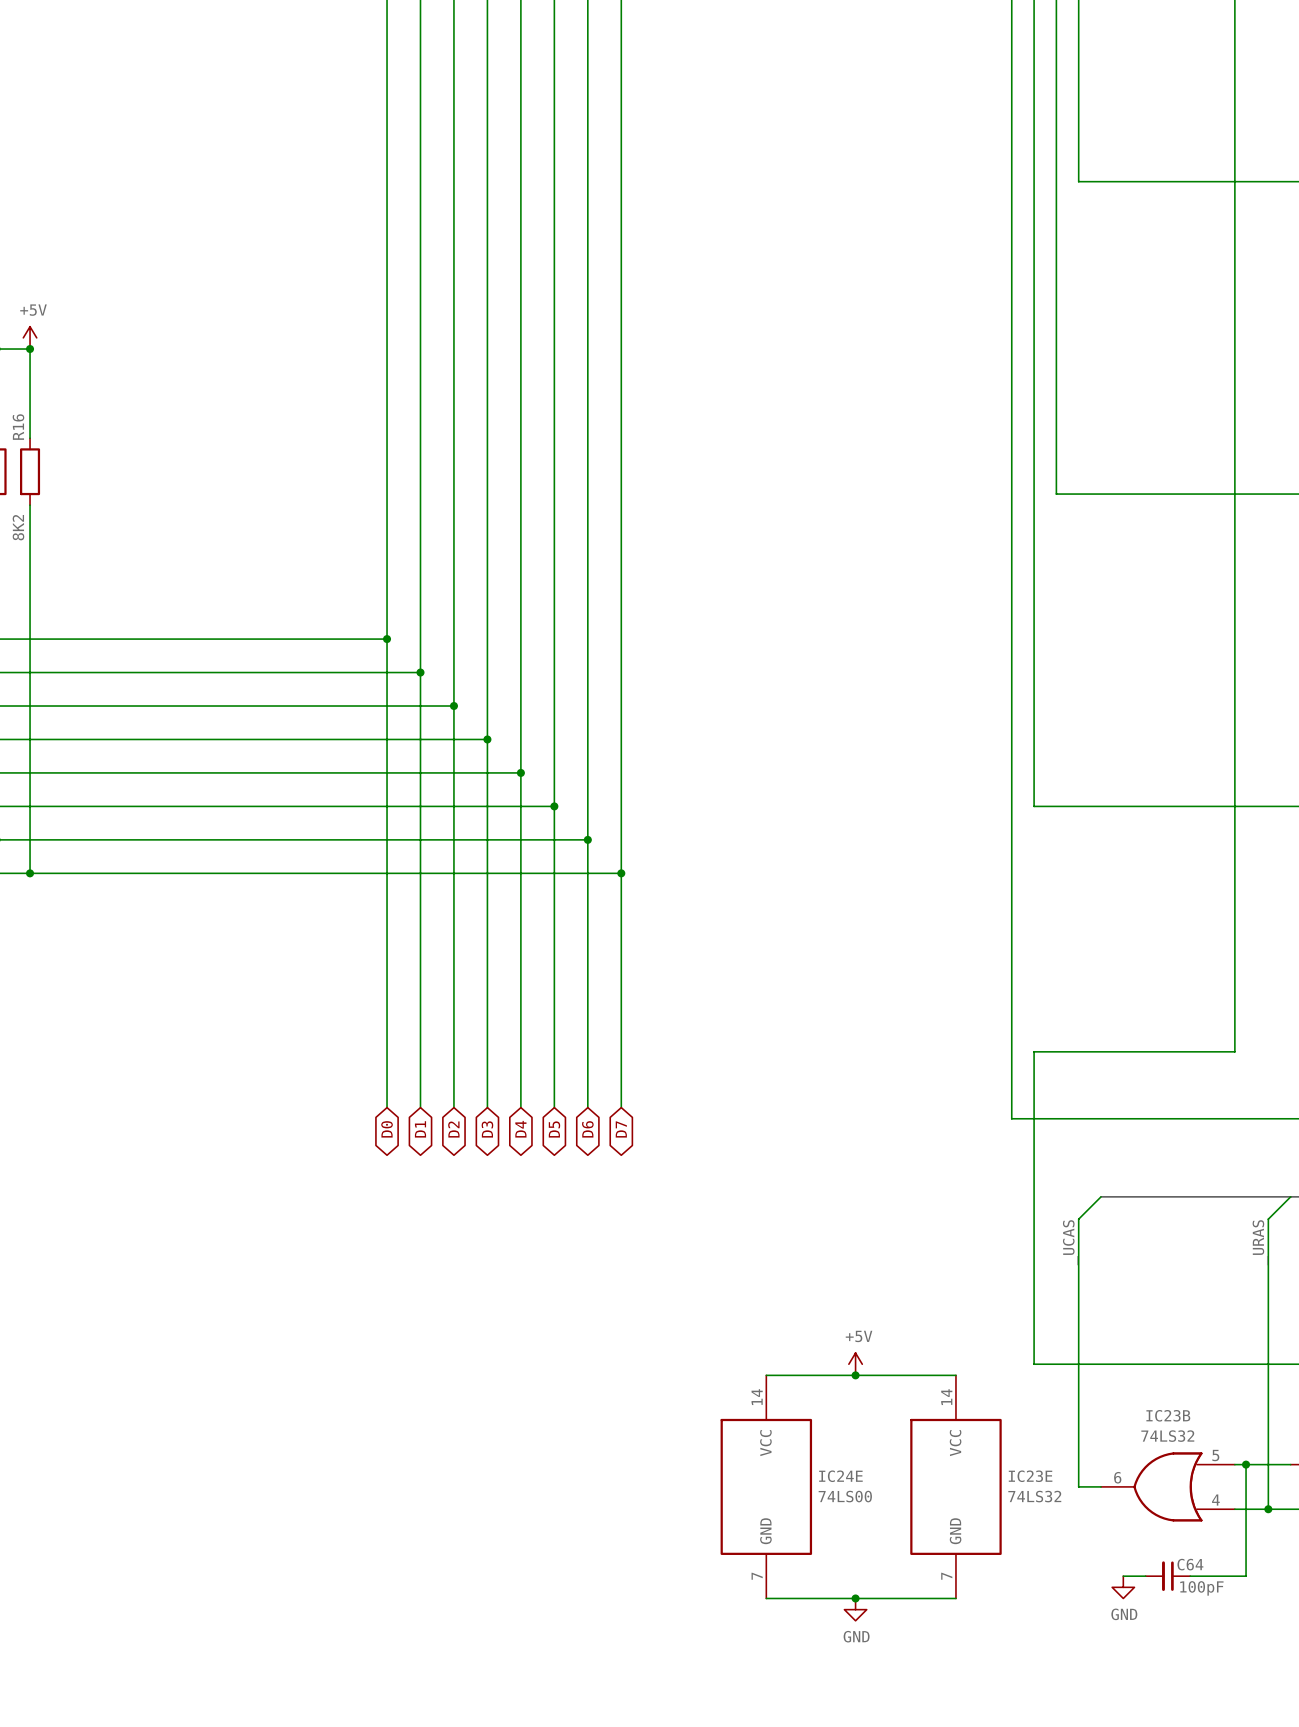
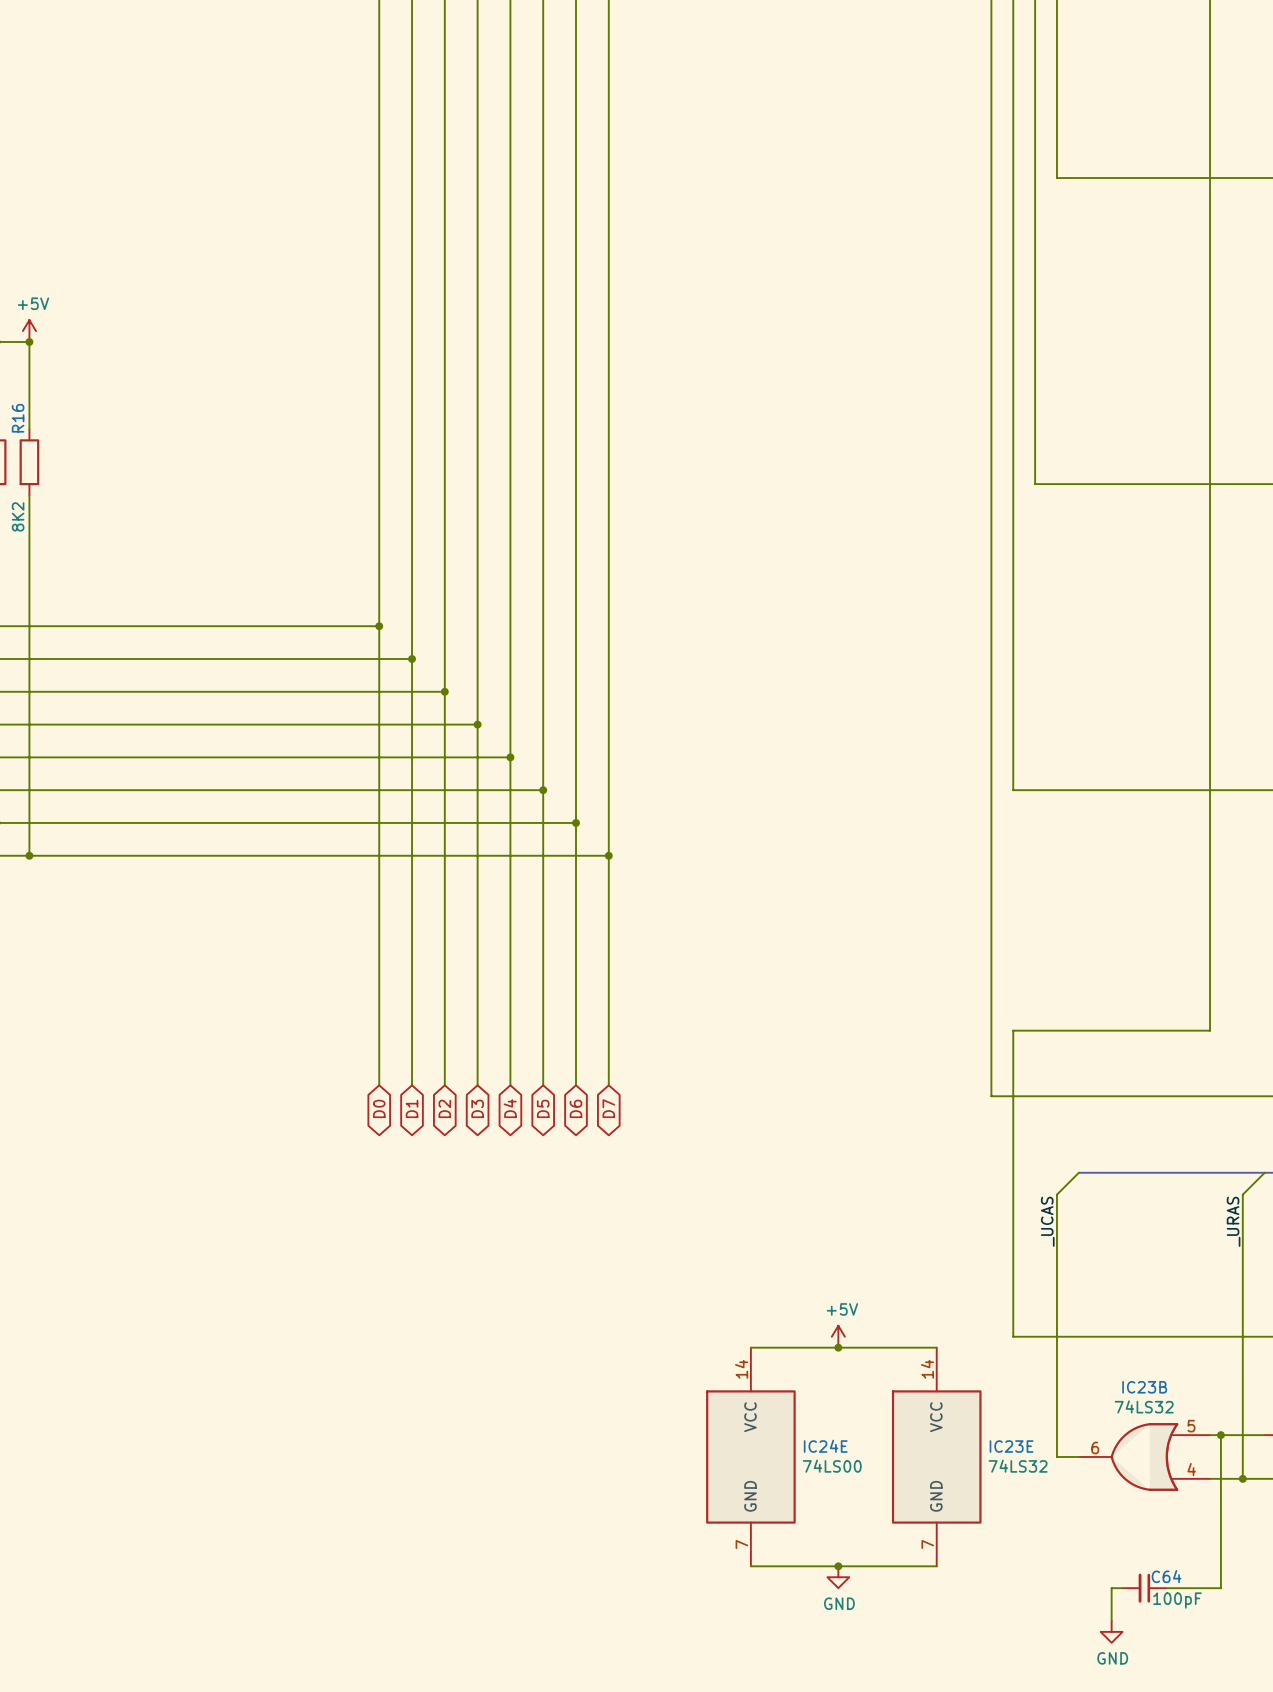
wire: (1123, 1576) (1145, 1576) -> none
C64 position: (1167, 1576) -> (1144, 1588)
wire: (1190, 1576) (1246, 1576) -> (1166, 1588) (1220, 1588) (1220, 1544)
power symbol position: GND (1123, 1587) -> GND (1111, 1631)
wire: none -> (1122, 1588) (1111, 1588) (1111, 1620)

